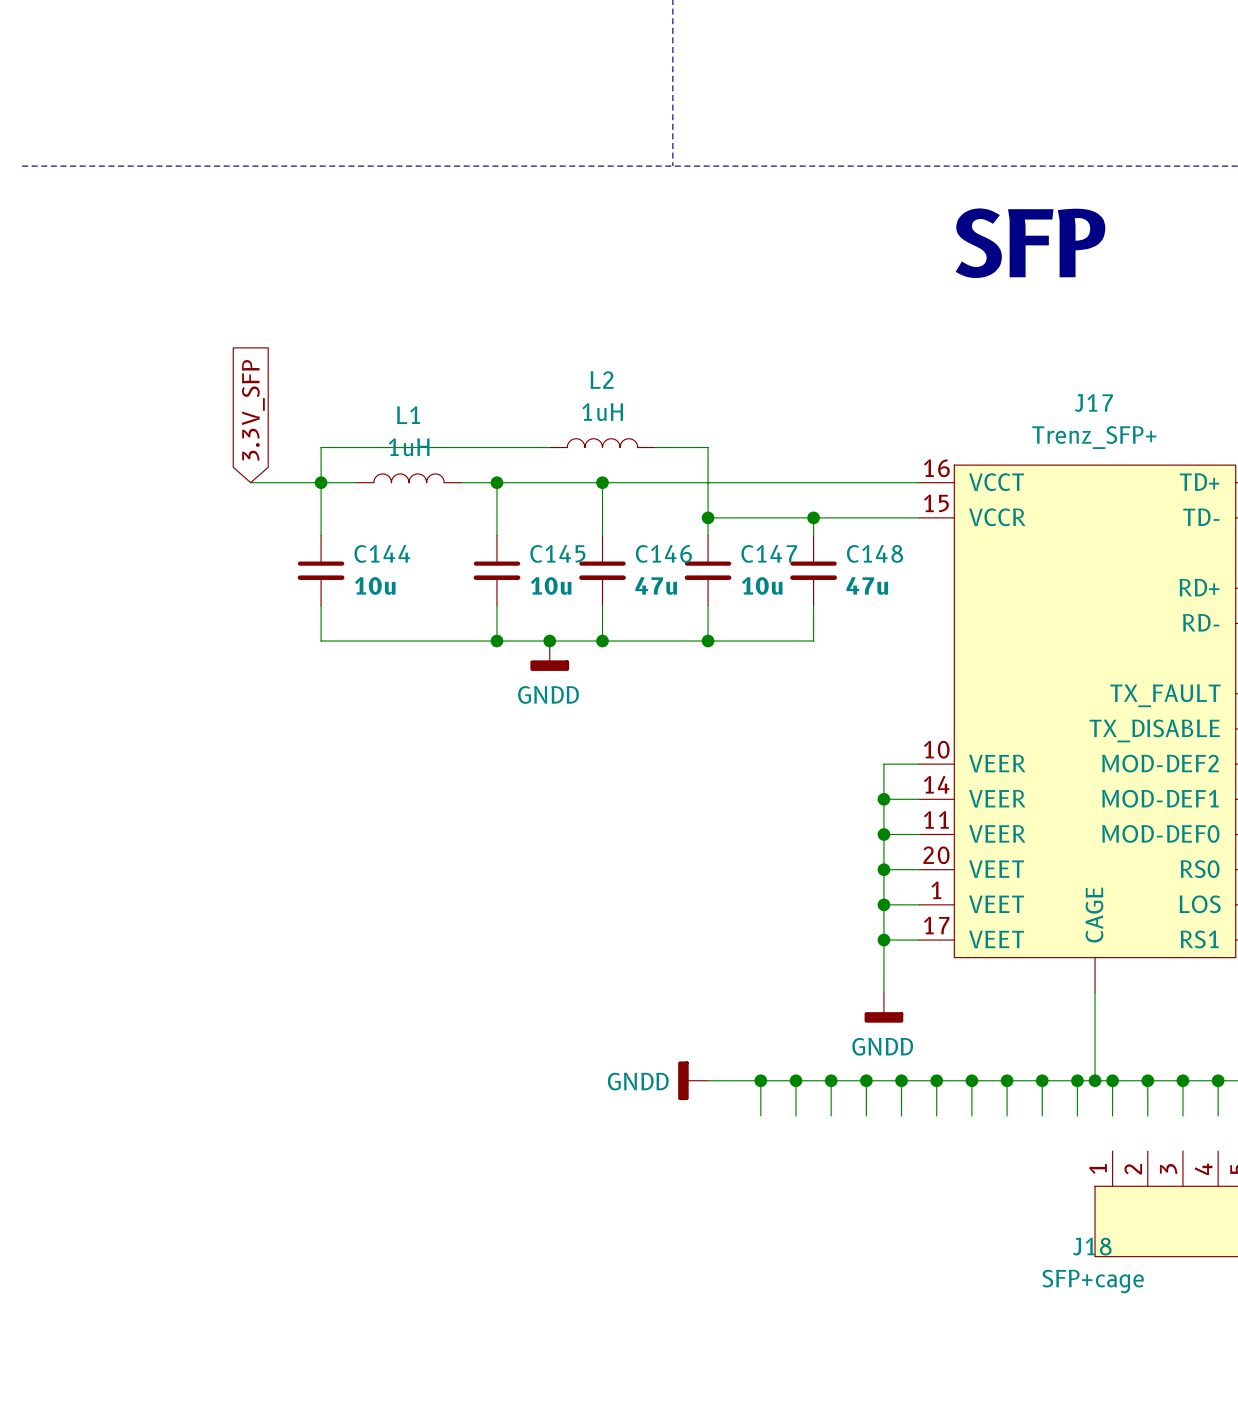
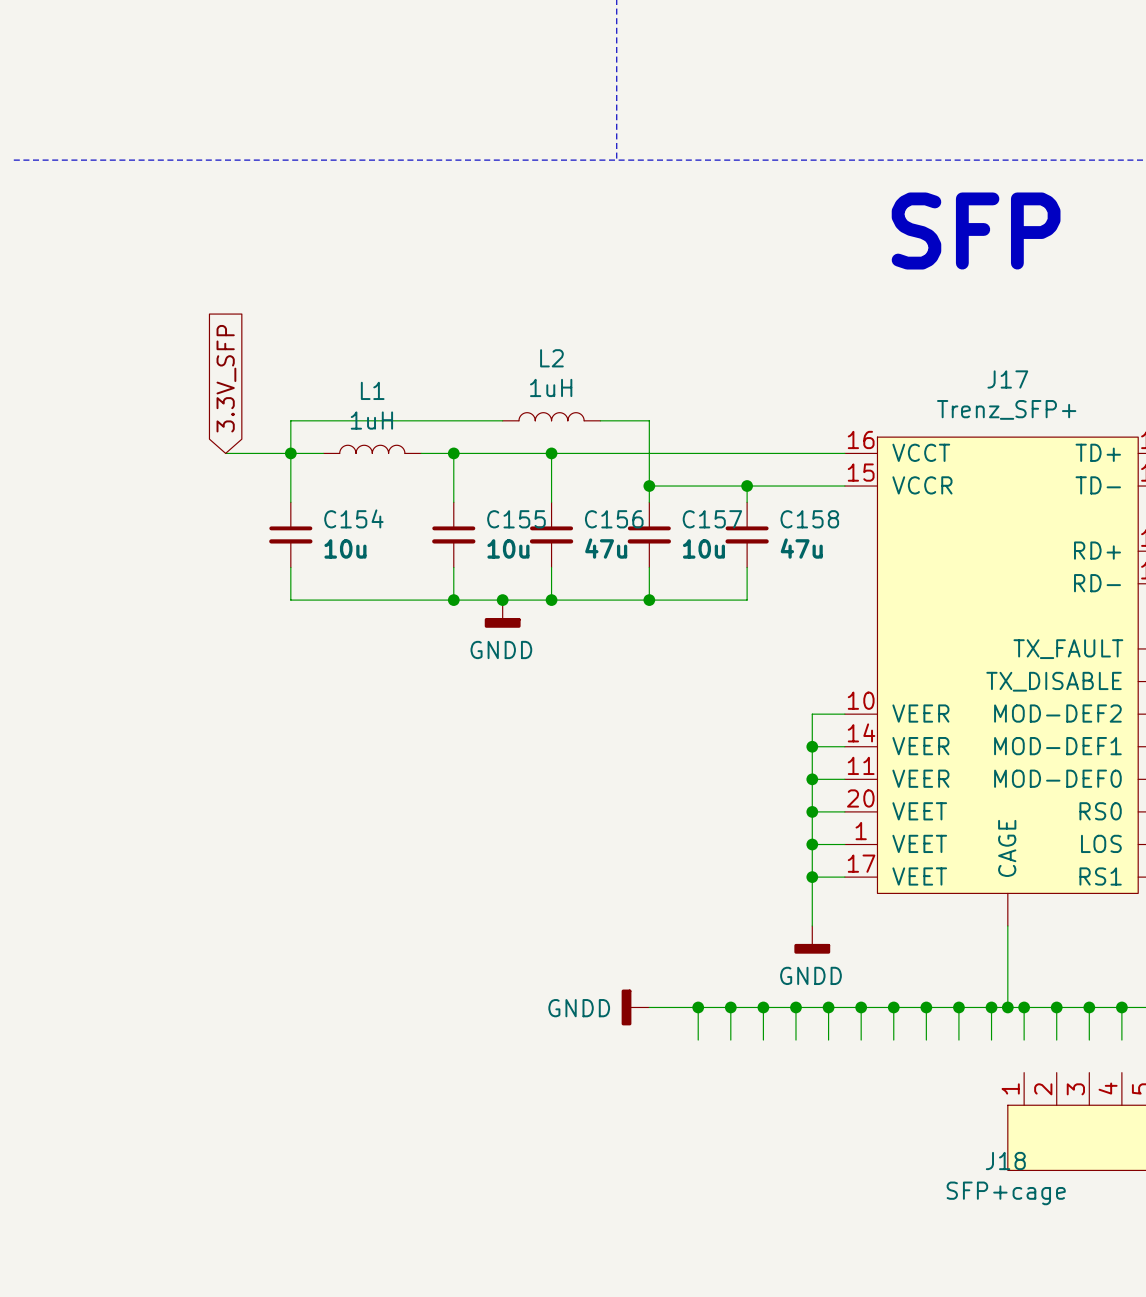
C144 name: C144 (382, 553) -> C154 (353, 518)
C145 name: C145 (557, 553) -> C155 (516, 519)
C146 name: C146 (663, 553) -> C156 (614, 519)
C147 name: C147 (769, 553) -> C157 (712, 519)
C148 name: C148 (875, 553) -> C158 (809, 519)

